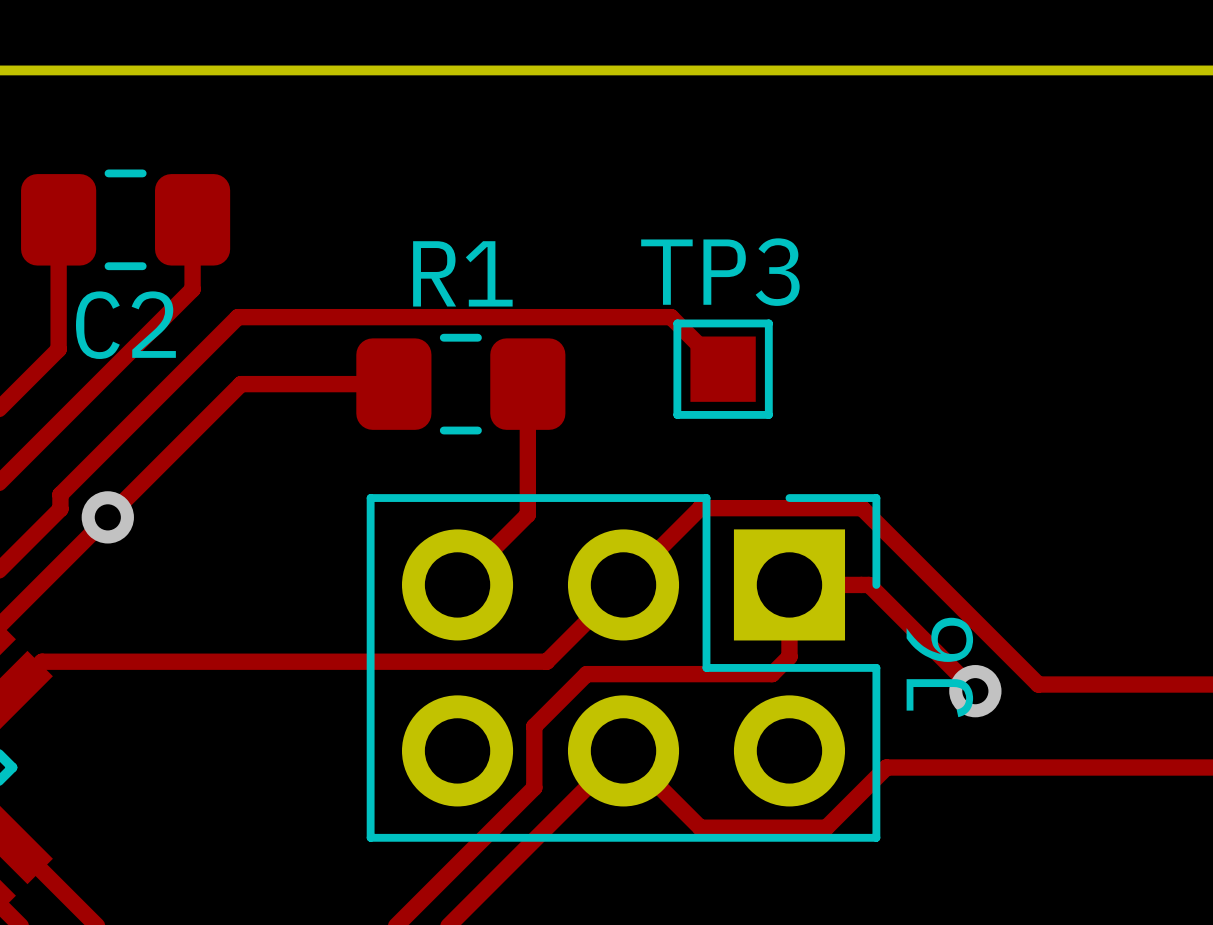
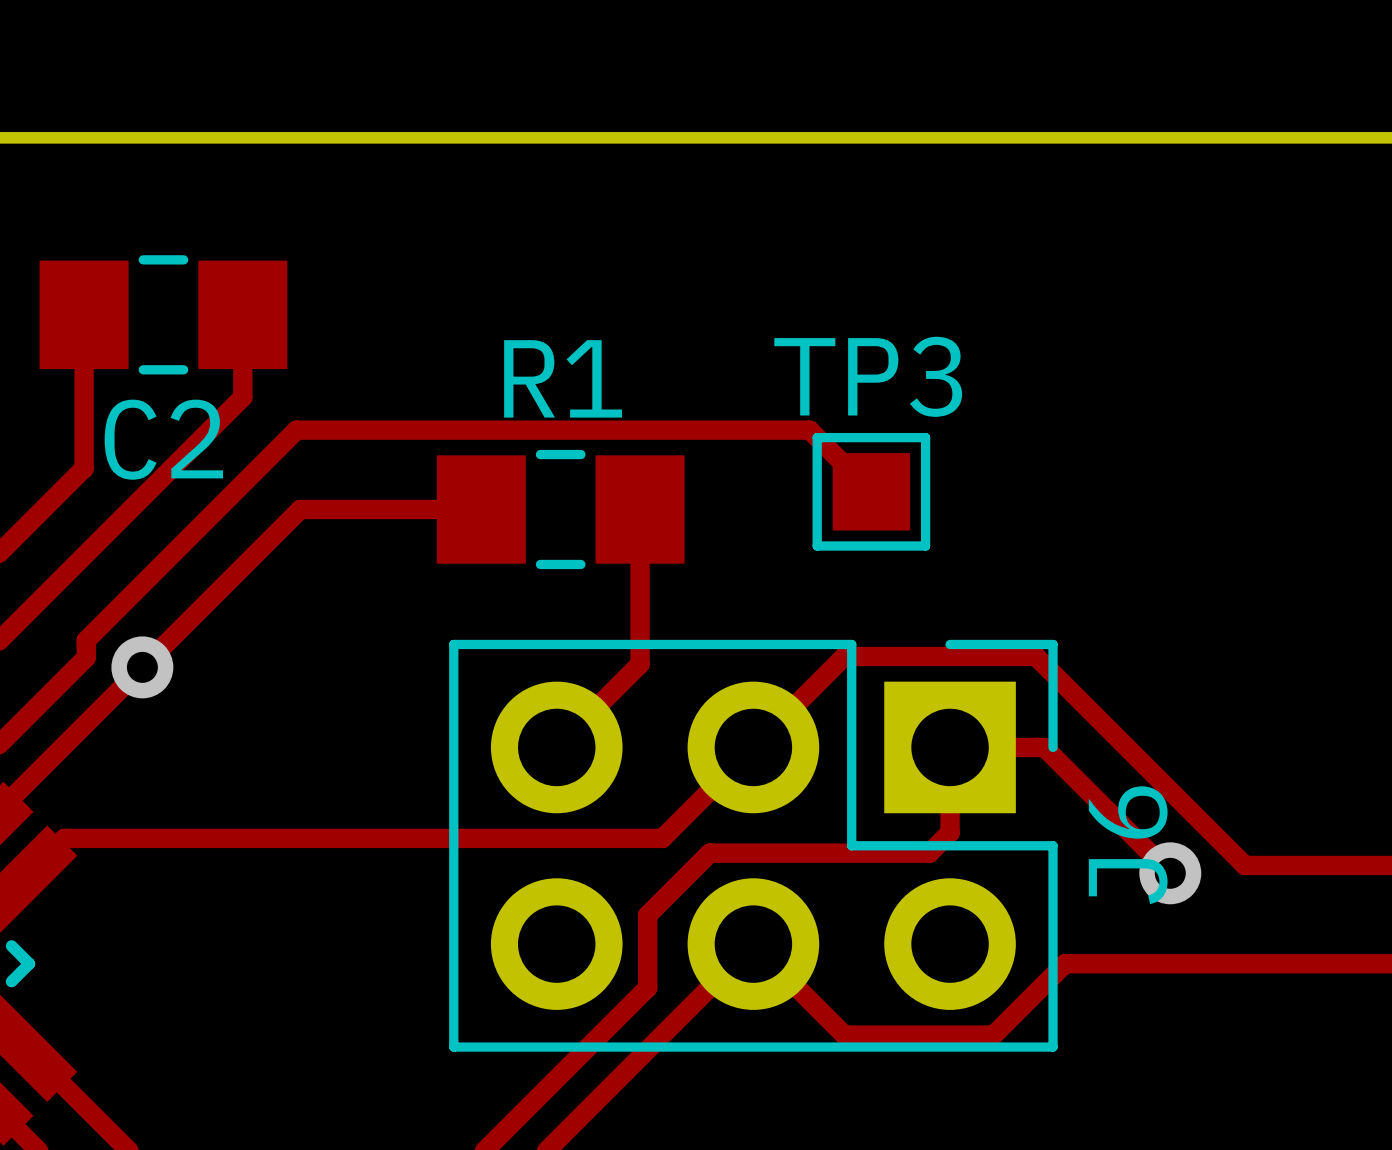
C2 footprint: [21, 169, 231, 271] -> [39, 255, 288, 375]
R1 footprint: [356, 333, 566, 435] -> [436, 449, 685, 570]

